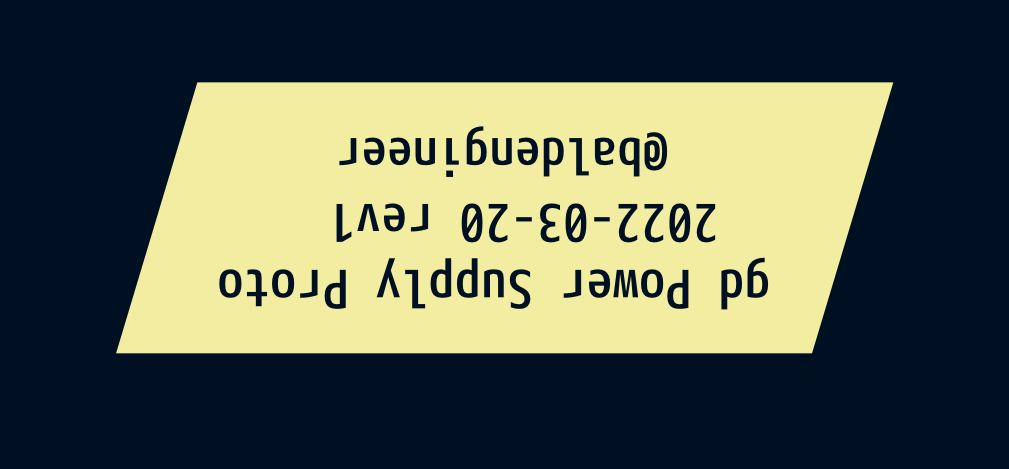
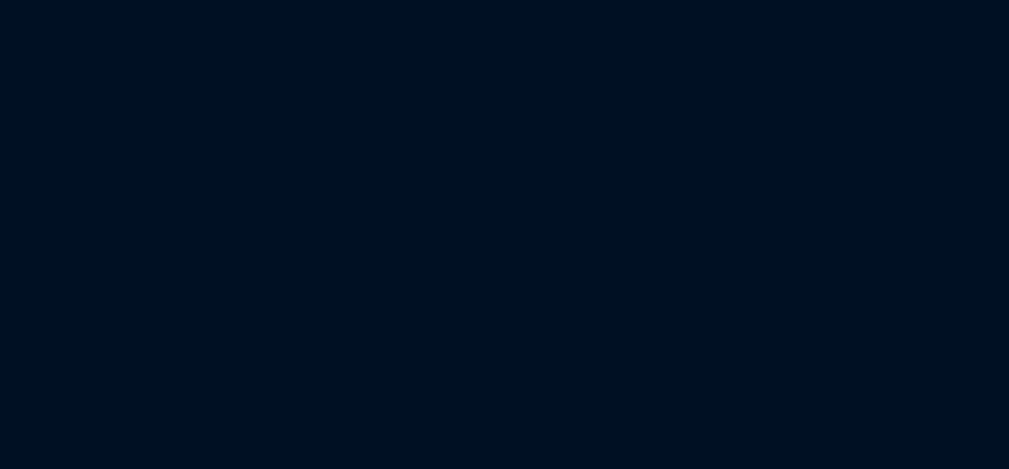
drawing: [116, 82, 894, 354] -> none

